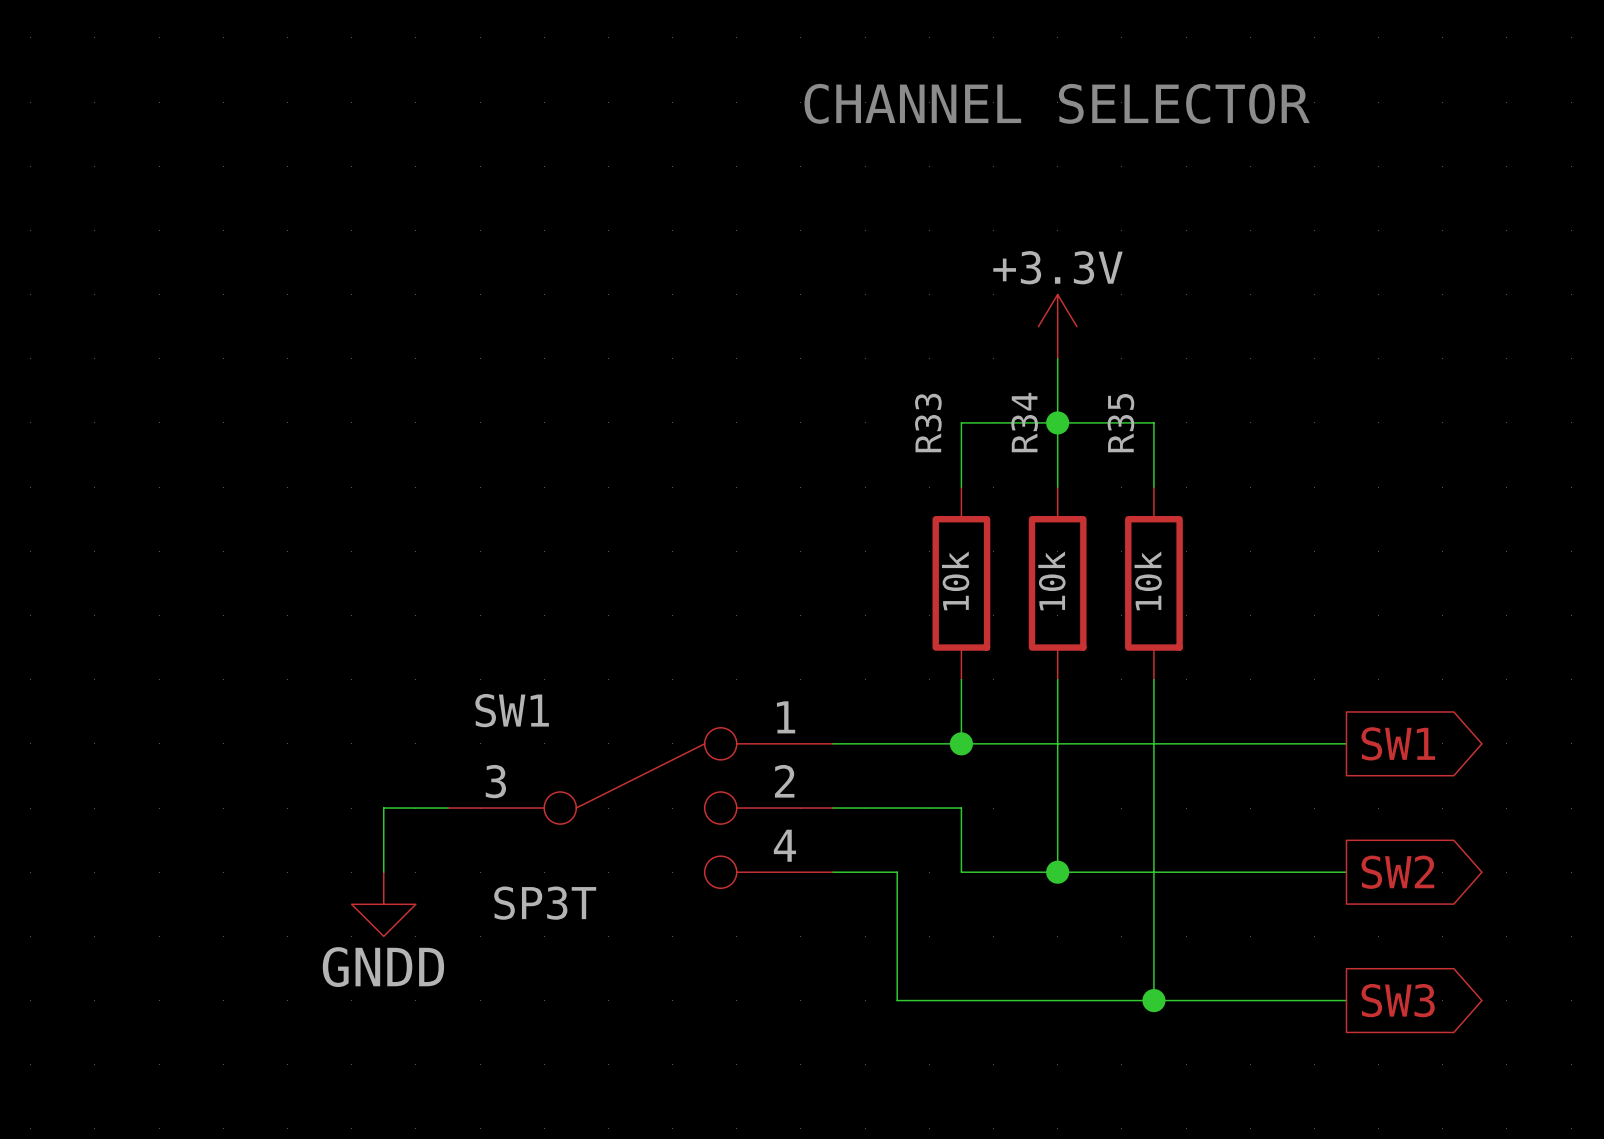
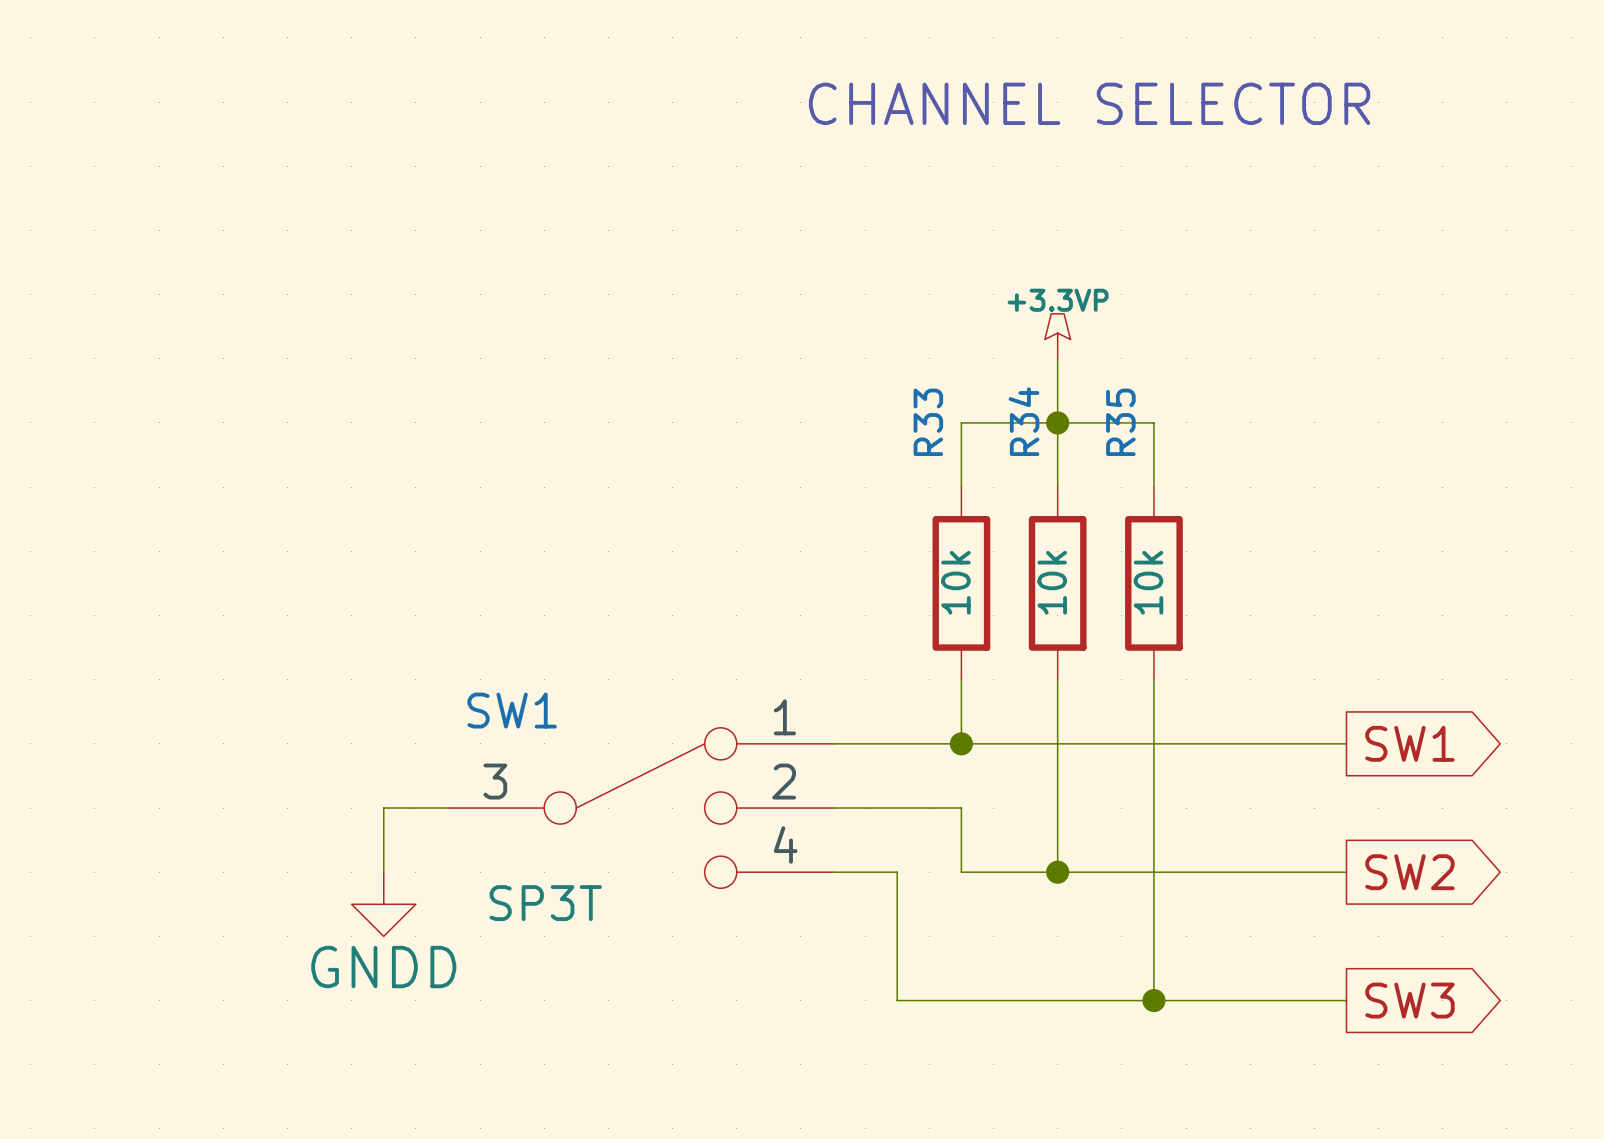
power symbol: +3.3V (1057, 326) -> +3.3VP (1057, 336)

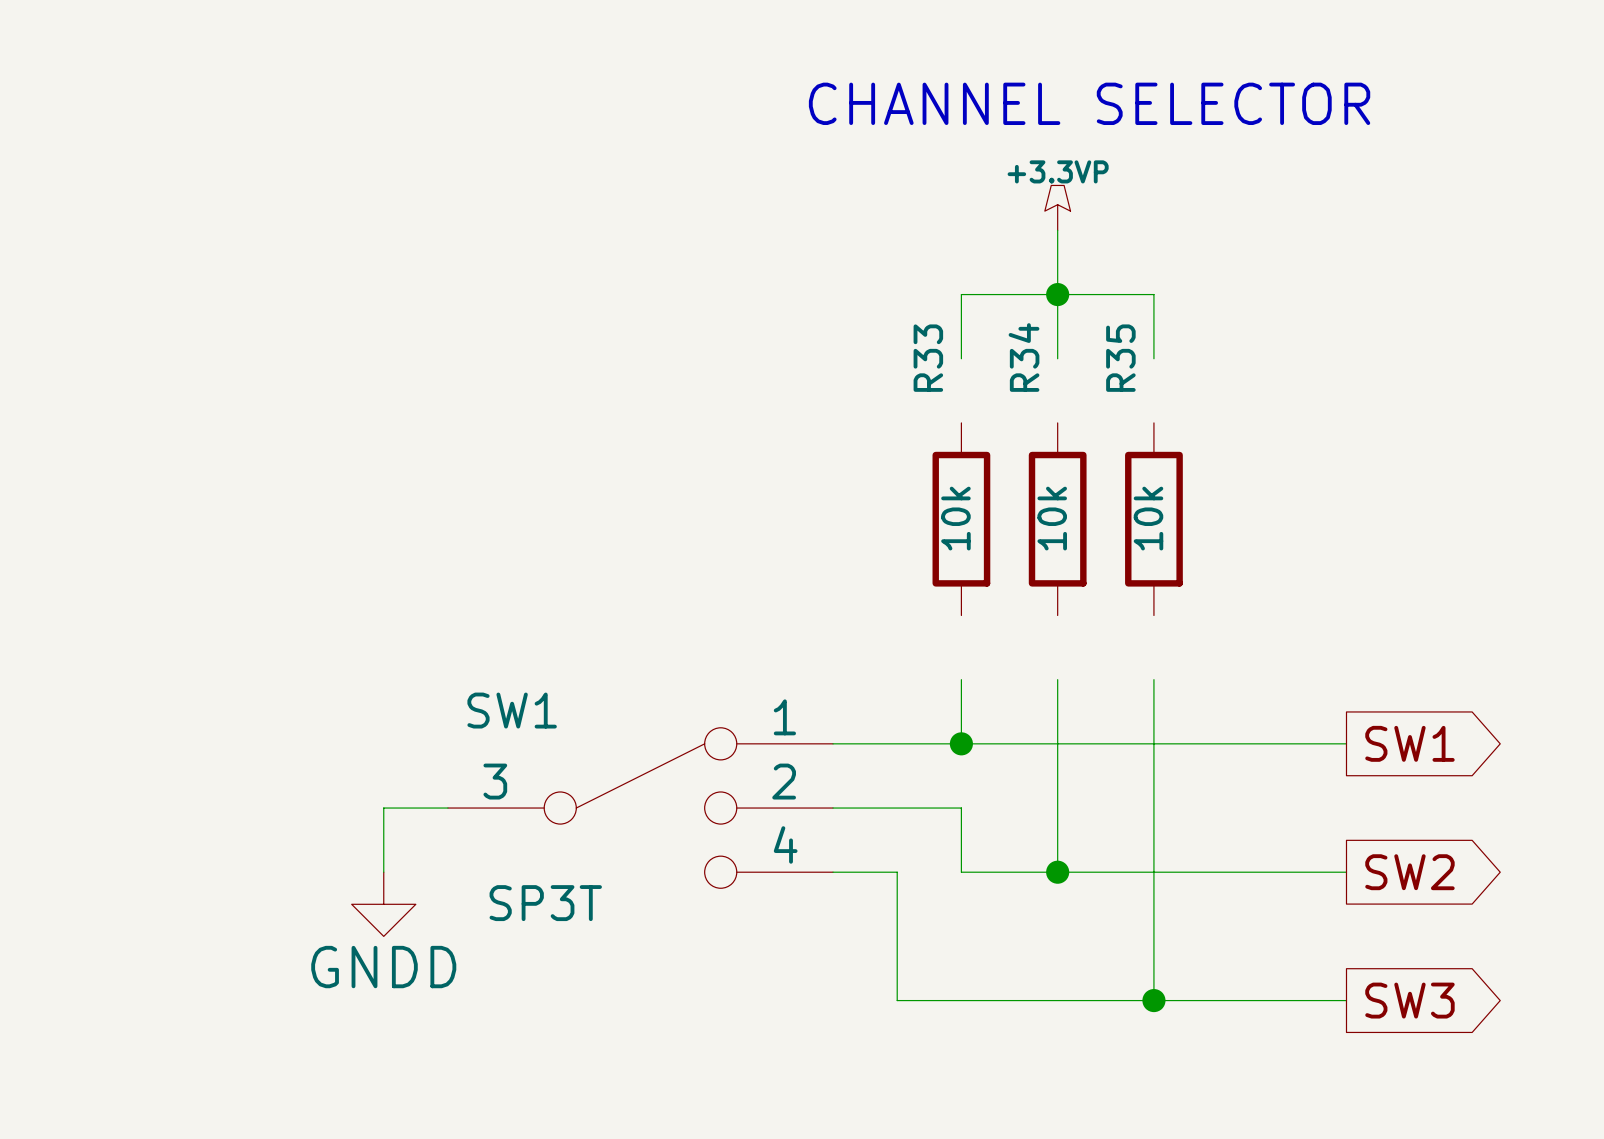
power symbol position: +3.3VP (1057, 336) -> +3.3VP (1057, 207)
wire: (1057, 358) (1057, 487) -> (1057, 358) (1057, 230)
junction position: (1057, 422) -> (1057, 294)
wire: (961, 487) (961, 422) (1153, 422) (1153, 487) -> (961, 358) (961, 294) (1153, 294) (1153, 358)
R33 position: (961, 583) -> (961, 519)
R34 position: (1057, 583) -> (1057, 519)
R35 position: (1153, 583) -> (1153, 519)

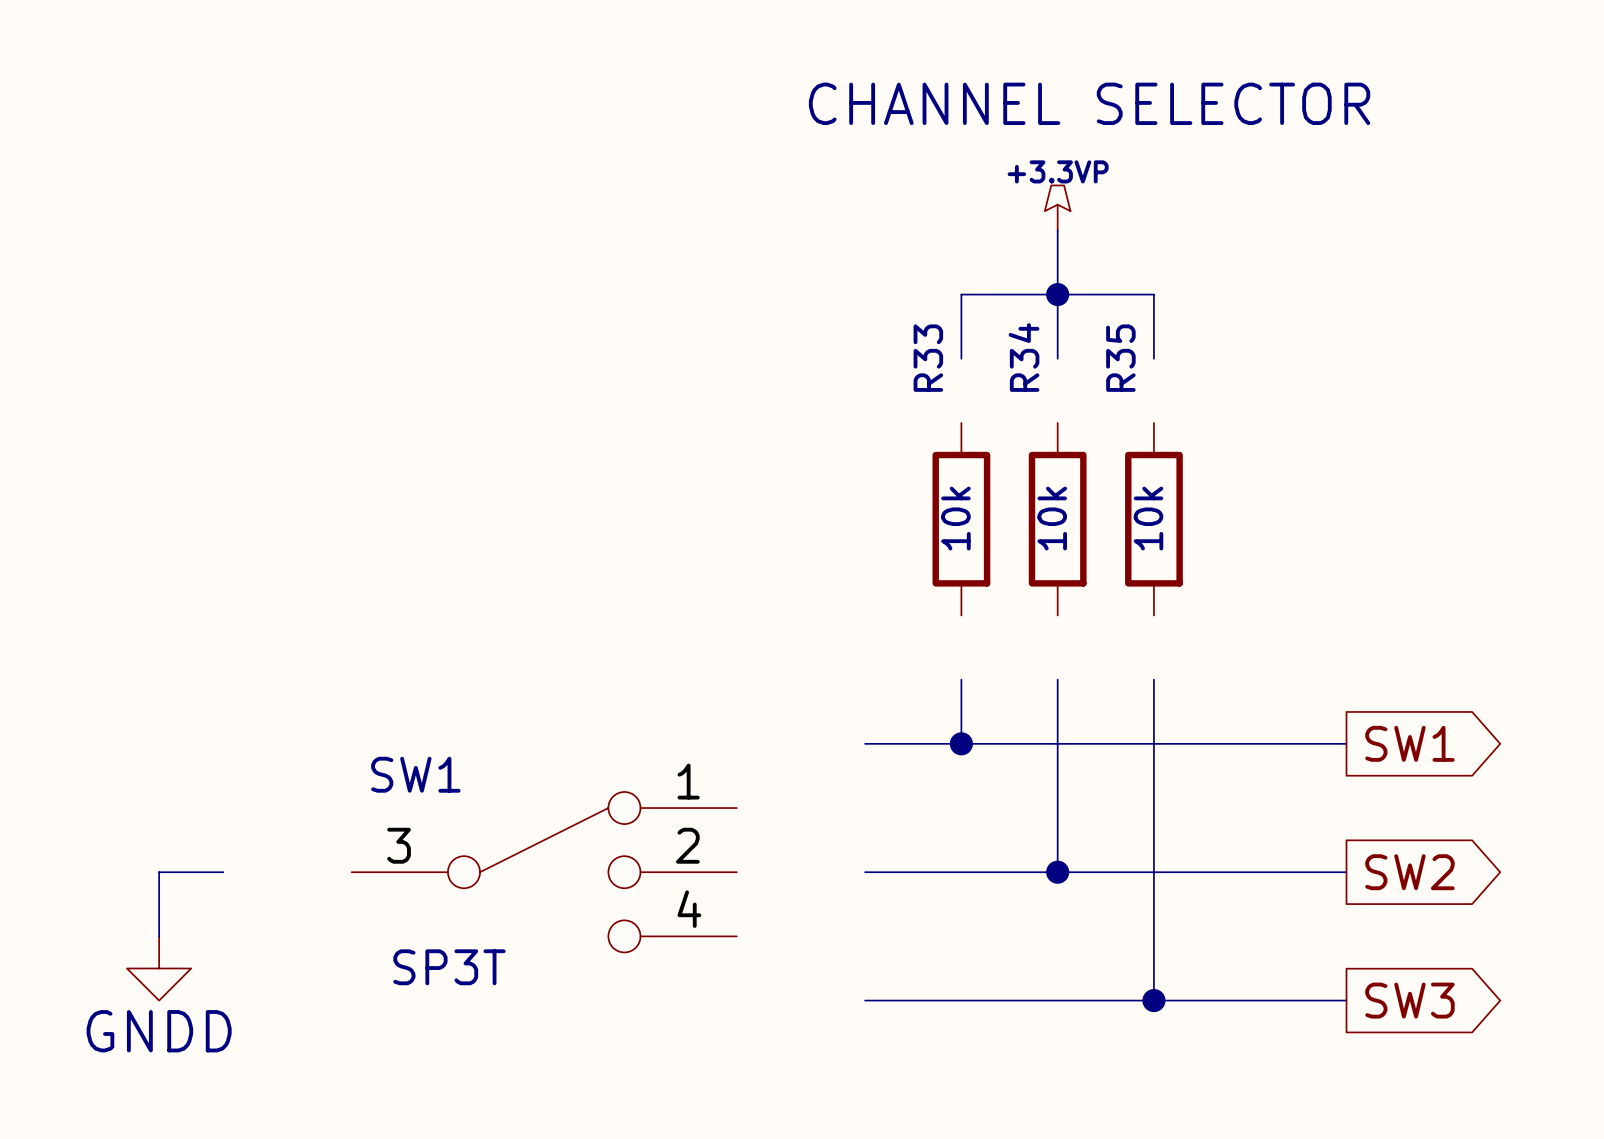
wire: (833, 743) (865, 743) -> none
wire: (447, 808) (383, 808) (383, 872) -> (223, 872) (159, 872) (159, 936)
SW1 position: (640, 808) -> (544, 872)
wire: (833, 808) (961, 808) (961, 872) -> (897, 872) (961, 872)
wire: (833, 872) (865, 872) -> none
wire: (897, 872) (897, 1000) -> (865, 1000) (897, 1000)
power symbol position: GNDD (383, 904) -> GNDD (159, 968)

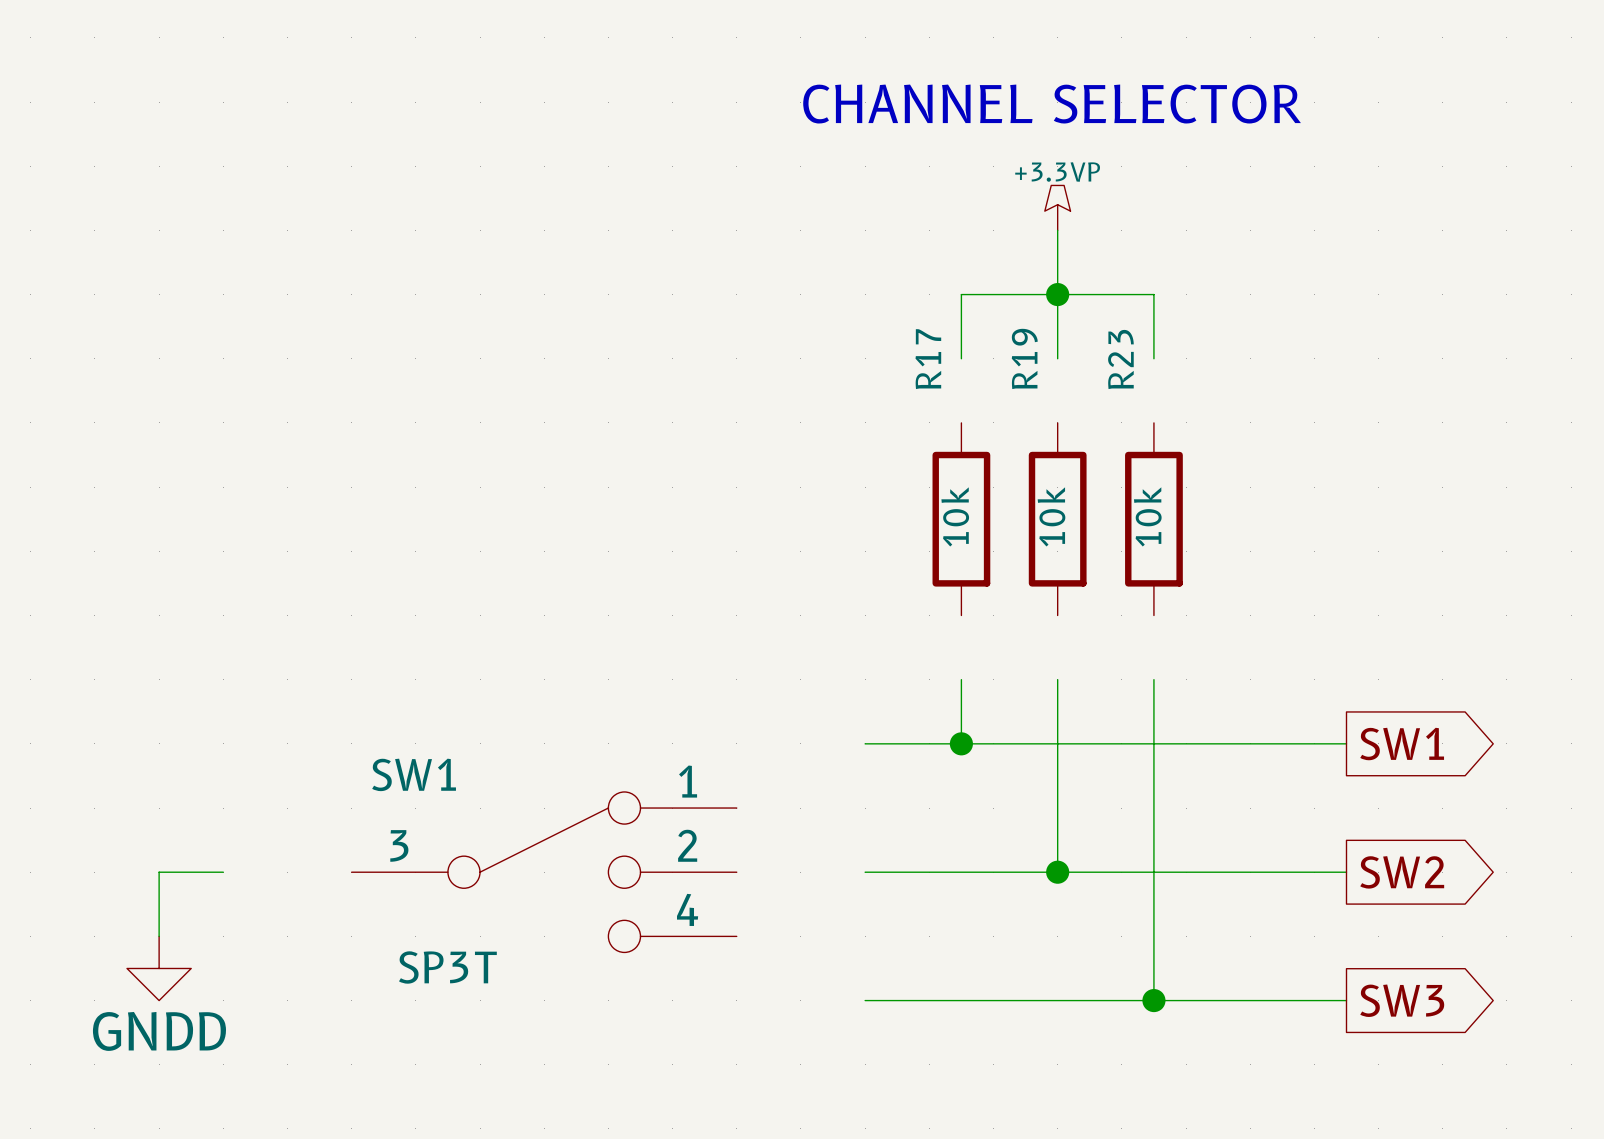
R34 name: R34 (1024, 357) -> R19 (1024, 358)
R33 name: R33 (928, 358) -> R17 (928, 359)
R35 name: R35 (1120, 358) -> R23 (1120, 359)

